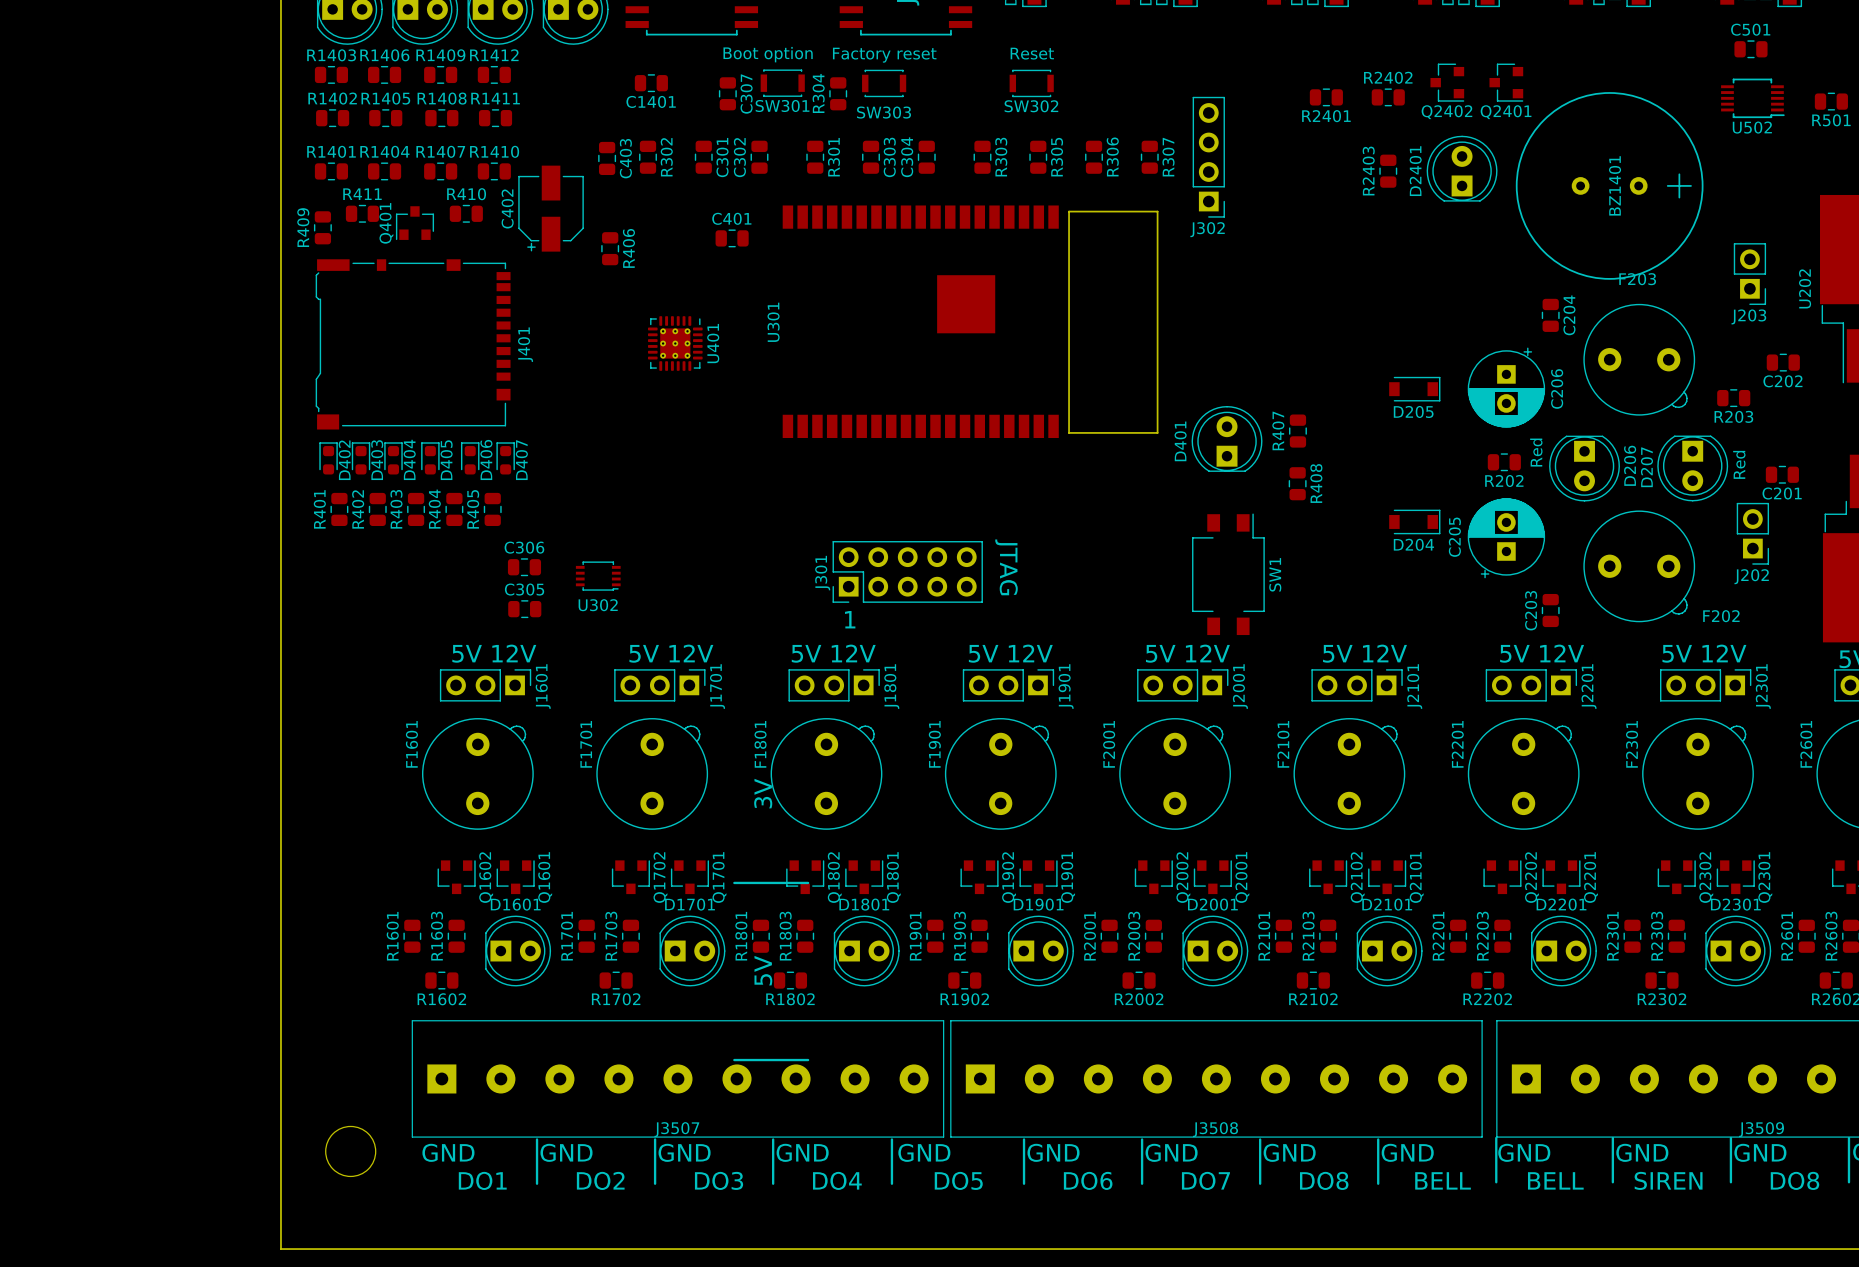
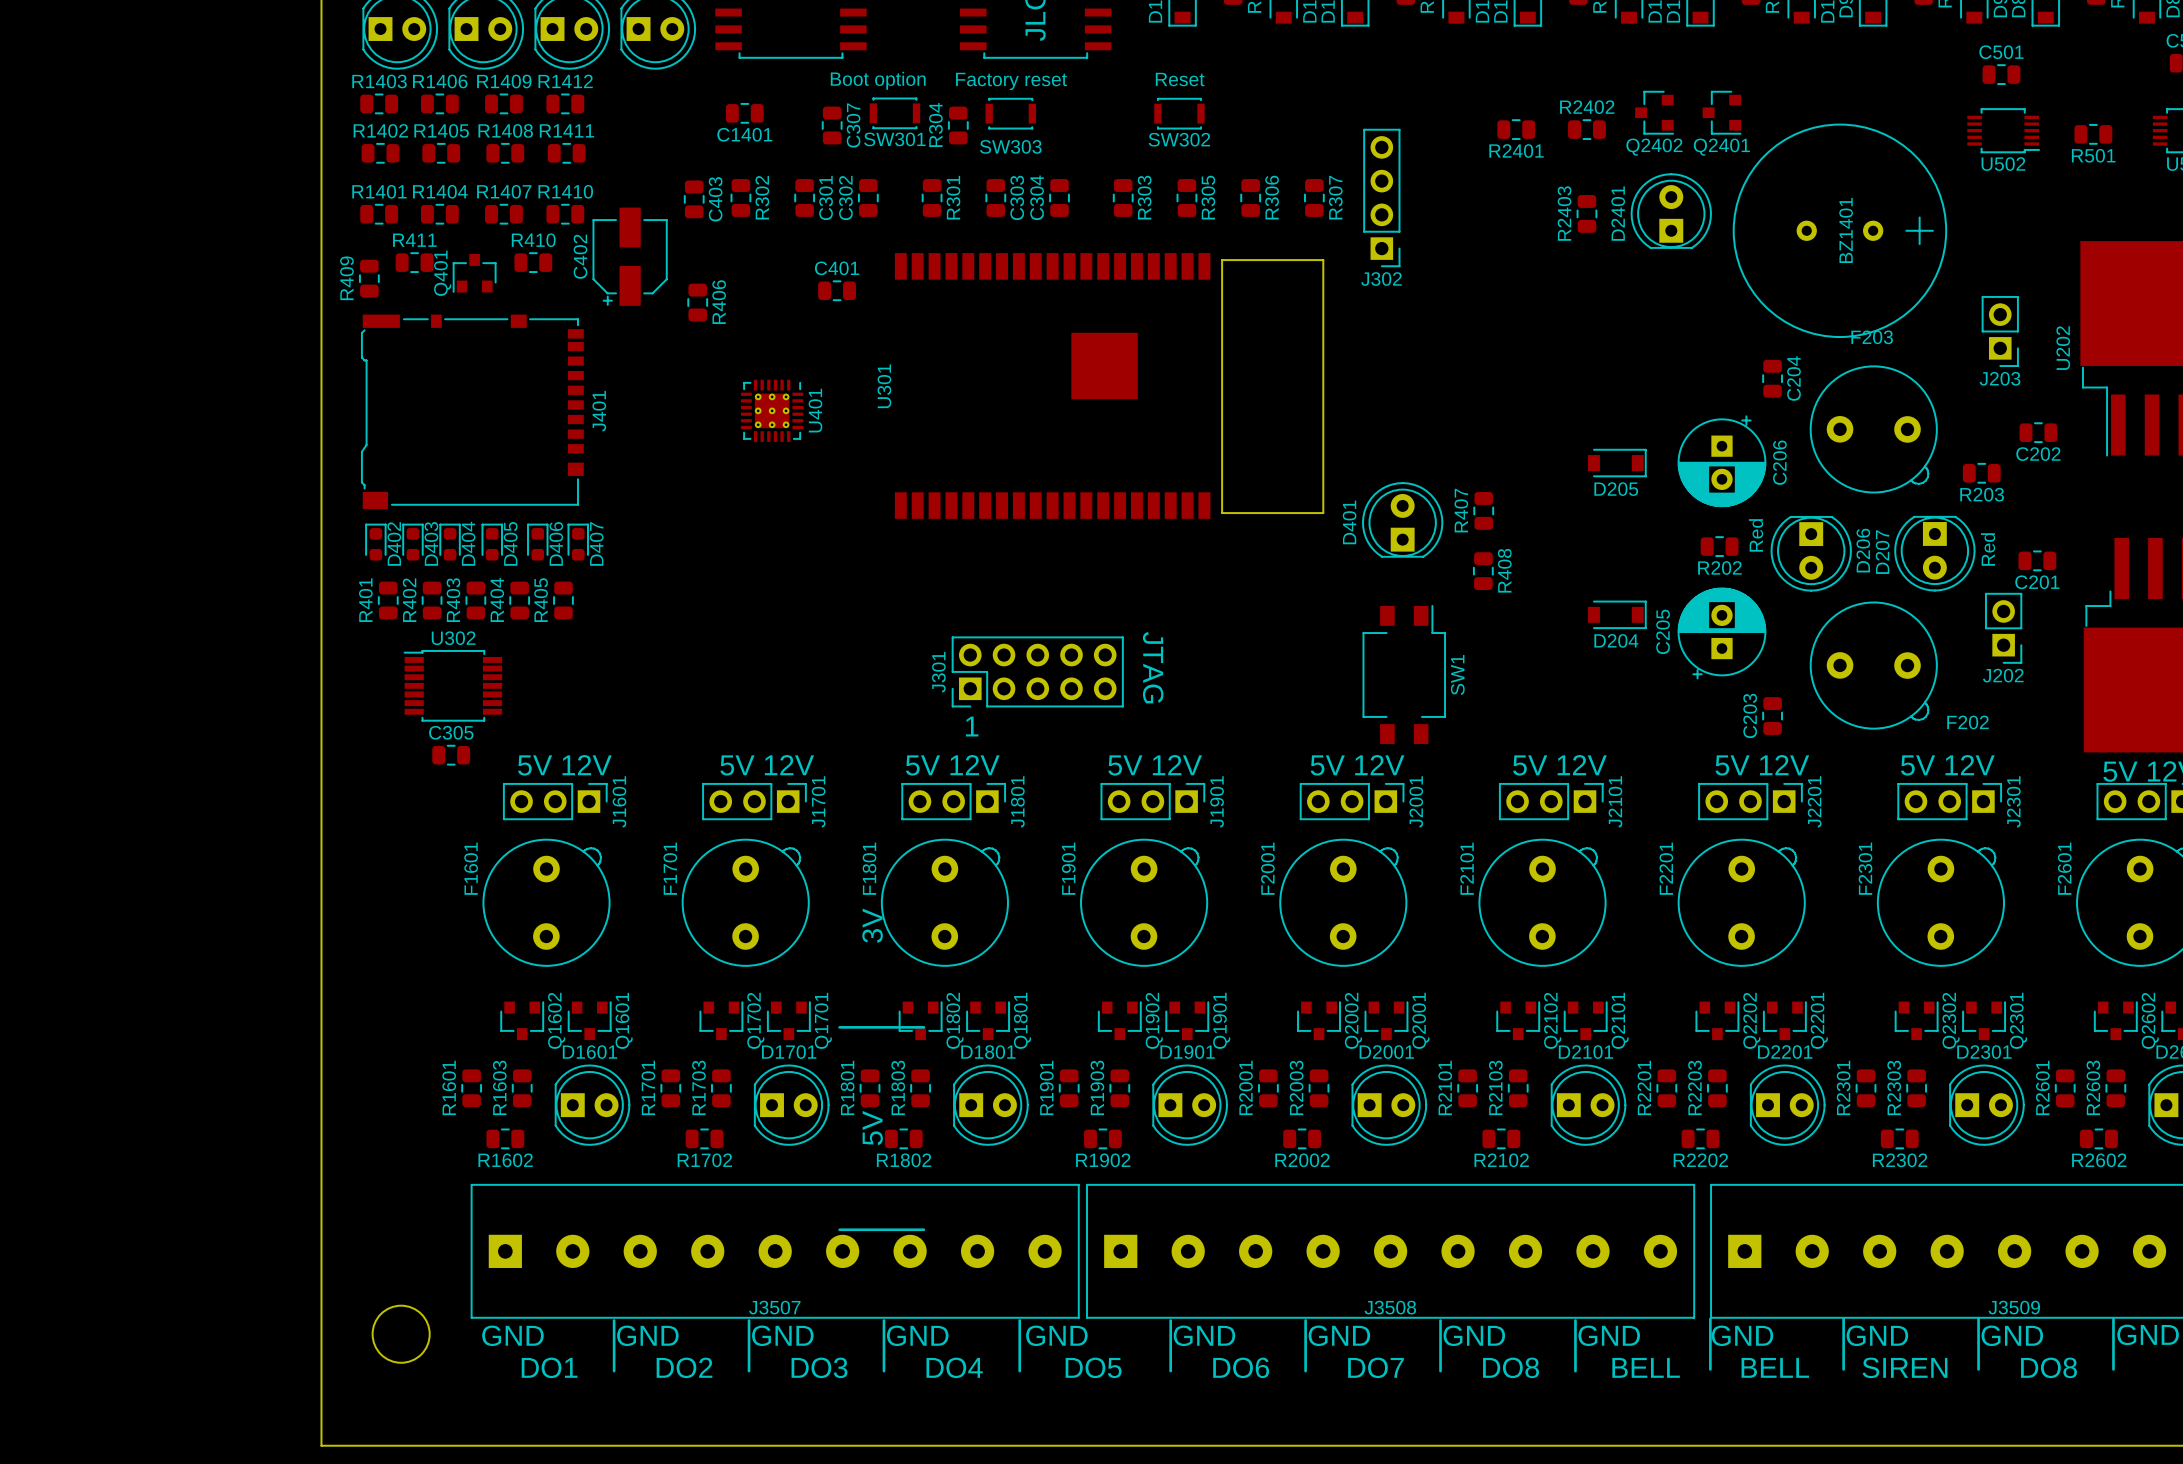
U302 footprint: [575, 561, 621, 591] -> [403, 649, 503, 722]
C306: (524, 567) -> none
U302 name position: U302 (598, 605) -> U302 (453, 638)
C305 position: (524, 609) -> (451, 755)

